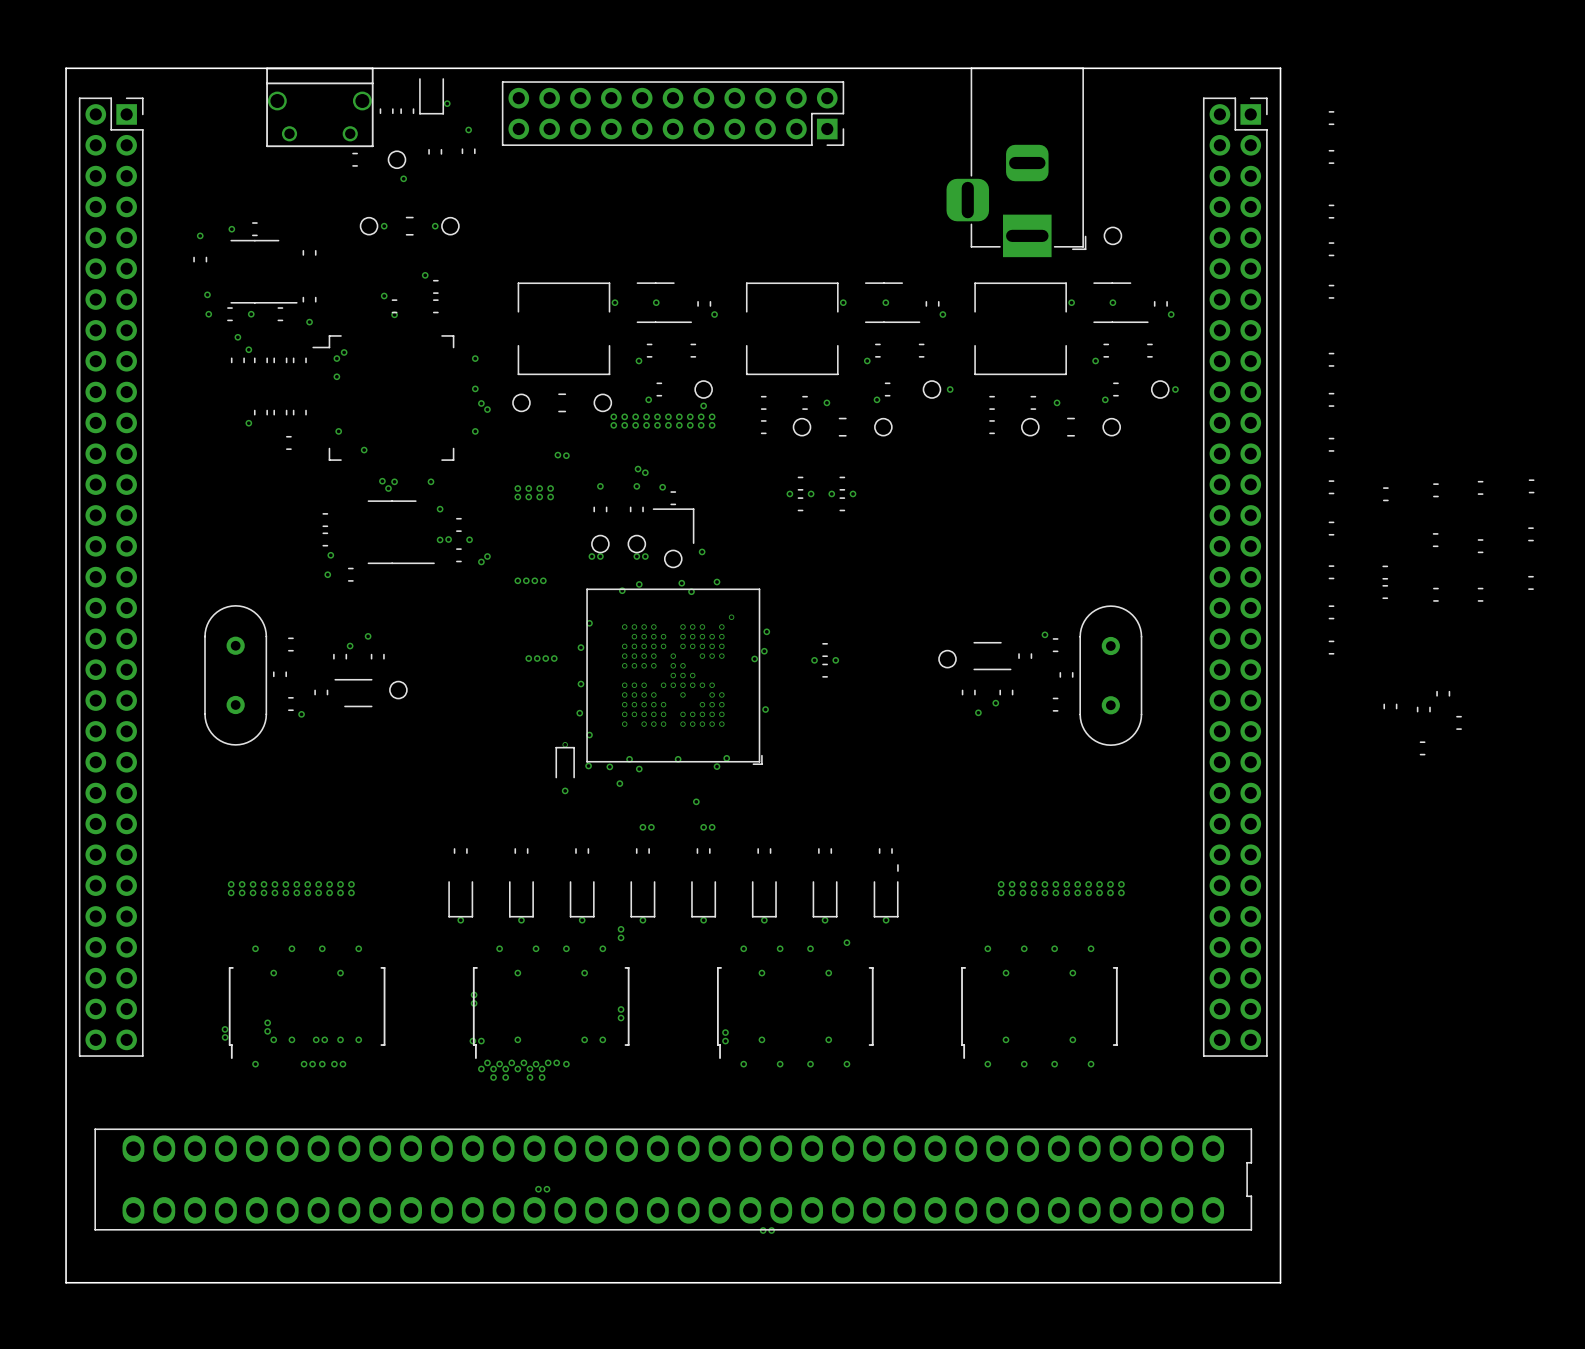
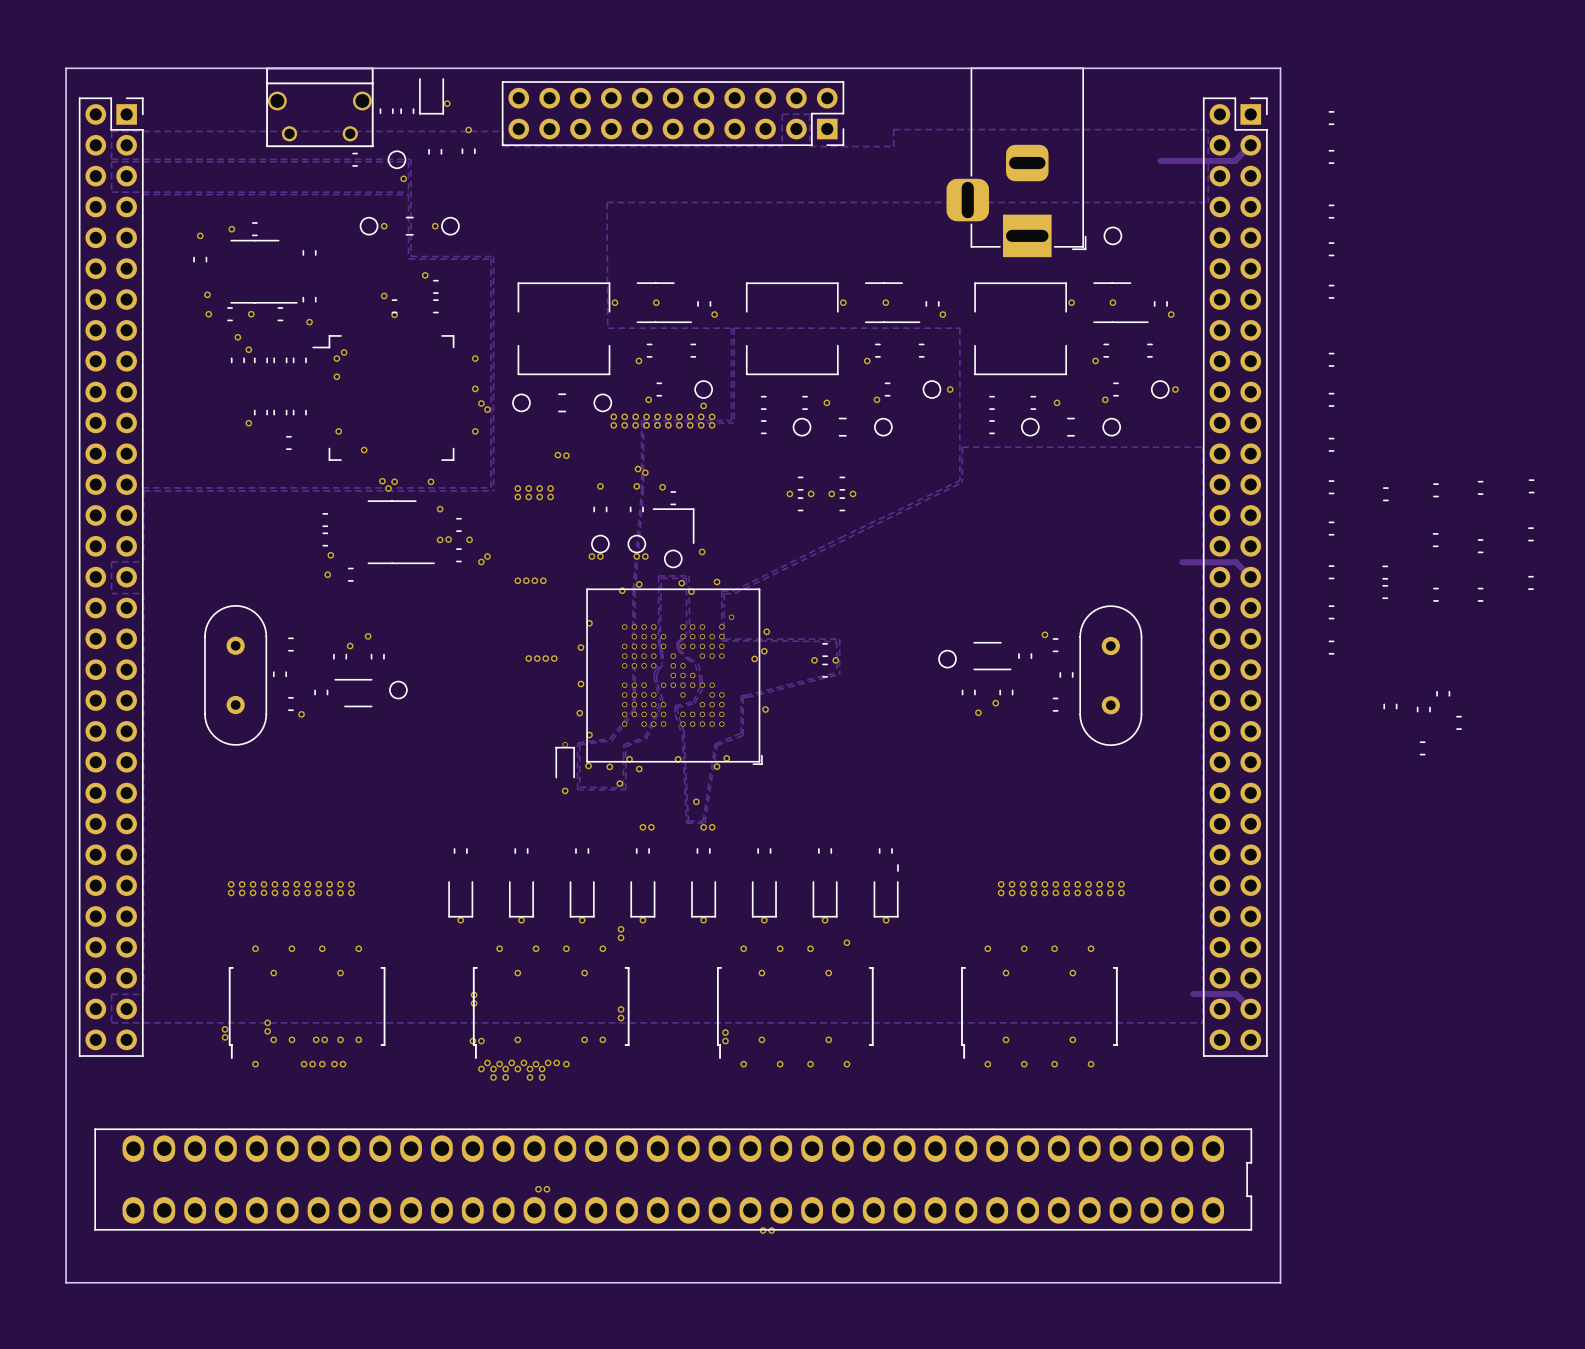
zone outline: none -> (782, 114) (782, 146) (503, 146) (503, 131) (111, 131) (111, 159) (410, 159) (410, 256) (493, 256) (493, 490) (143, 490) (143, 561) (111, 561) (111, 593) (143, 593) (143, 994) (111, 994) (111, 1022) (1202, 1022) (1202, 447) (962, 447) (962, 482) (734, 593) (724, 593) (724, 639) (839, 639) (839, 674) (743, 697) (743, 735) (716, 745) (704, 823) (686, 823) (682, 735) (675, 714) (675, 705) (693, 701) (699, 686) (699, 677) (695, 664) (677, 650) (676, 642) (686, 633) (686, 578) (661, 578) (660, 642) (664, 662) (656, 676) (662, 700) (658, 711) (646, 738) (625, 746) (625, 789) (577, 789) (577, 743) (610, 738) (633, 710) (633, 589) (641, 489) (641, 420) (731, 420) (731, 328) (607, 328) (607, 202) (1208, 202) (1208, 129) (893, 129) (893, 146) (809, 146) (809, 114) (782, 114)
track: none -> (1250, 145) (1235, 160) (1160, 160)
zone outline: none -> (111, 161) (111, 192) (408, 192) (408, 161) (111, 161)
zone outline: none -> (142, 194) (142, 487) (491, 487) (491, 258) (408, 258) (408, 194) (142, 194)
zone outline: none -> (733, 328) (959, 328) (959, 480) (733, 591) (721, 591) (721, 640) (836, 641) (837, 672) (741, 695) (741, 733) (715, 744) (703, 821) (688, 821) (684, 731) (676, 707) (694, 703) (702, 688) (698, 664) (679, 649) (678, 643) (689, 633) (689, 575) (658, 575) (658, 643) (662, 662) (654, 671) (653, 676) (660, 700) (644, 737) (624, 744) (623, 787) (579, 787) (579, 744) (611, 740) (635, 711) (635, 591) (643, 489) (643, 422) (733, 422) (733, 328)
track: none -> (1182, 562) (1235, 562) (1250, 577)
track: none -> (1193, 994) (1235, 994) (1250, 1009)

